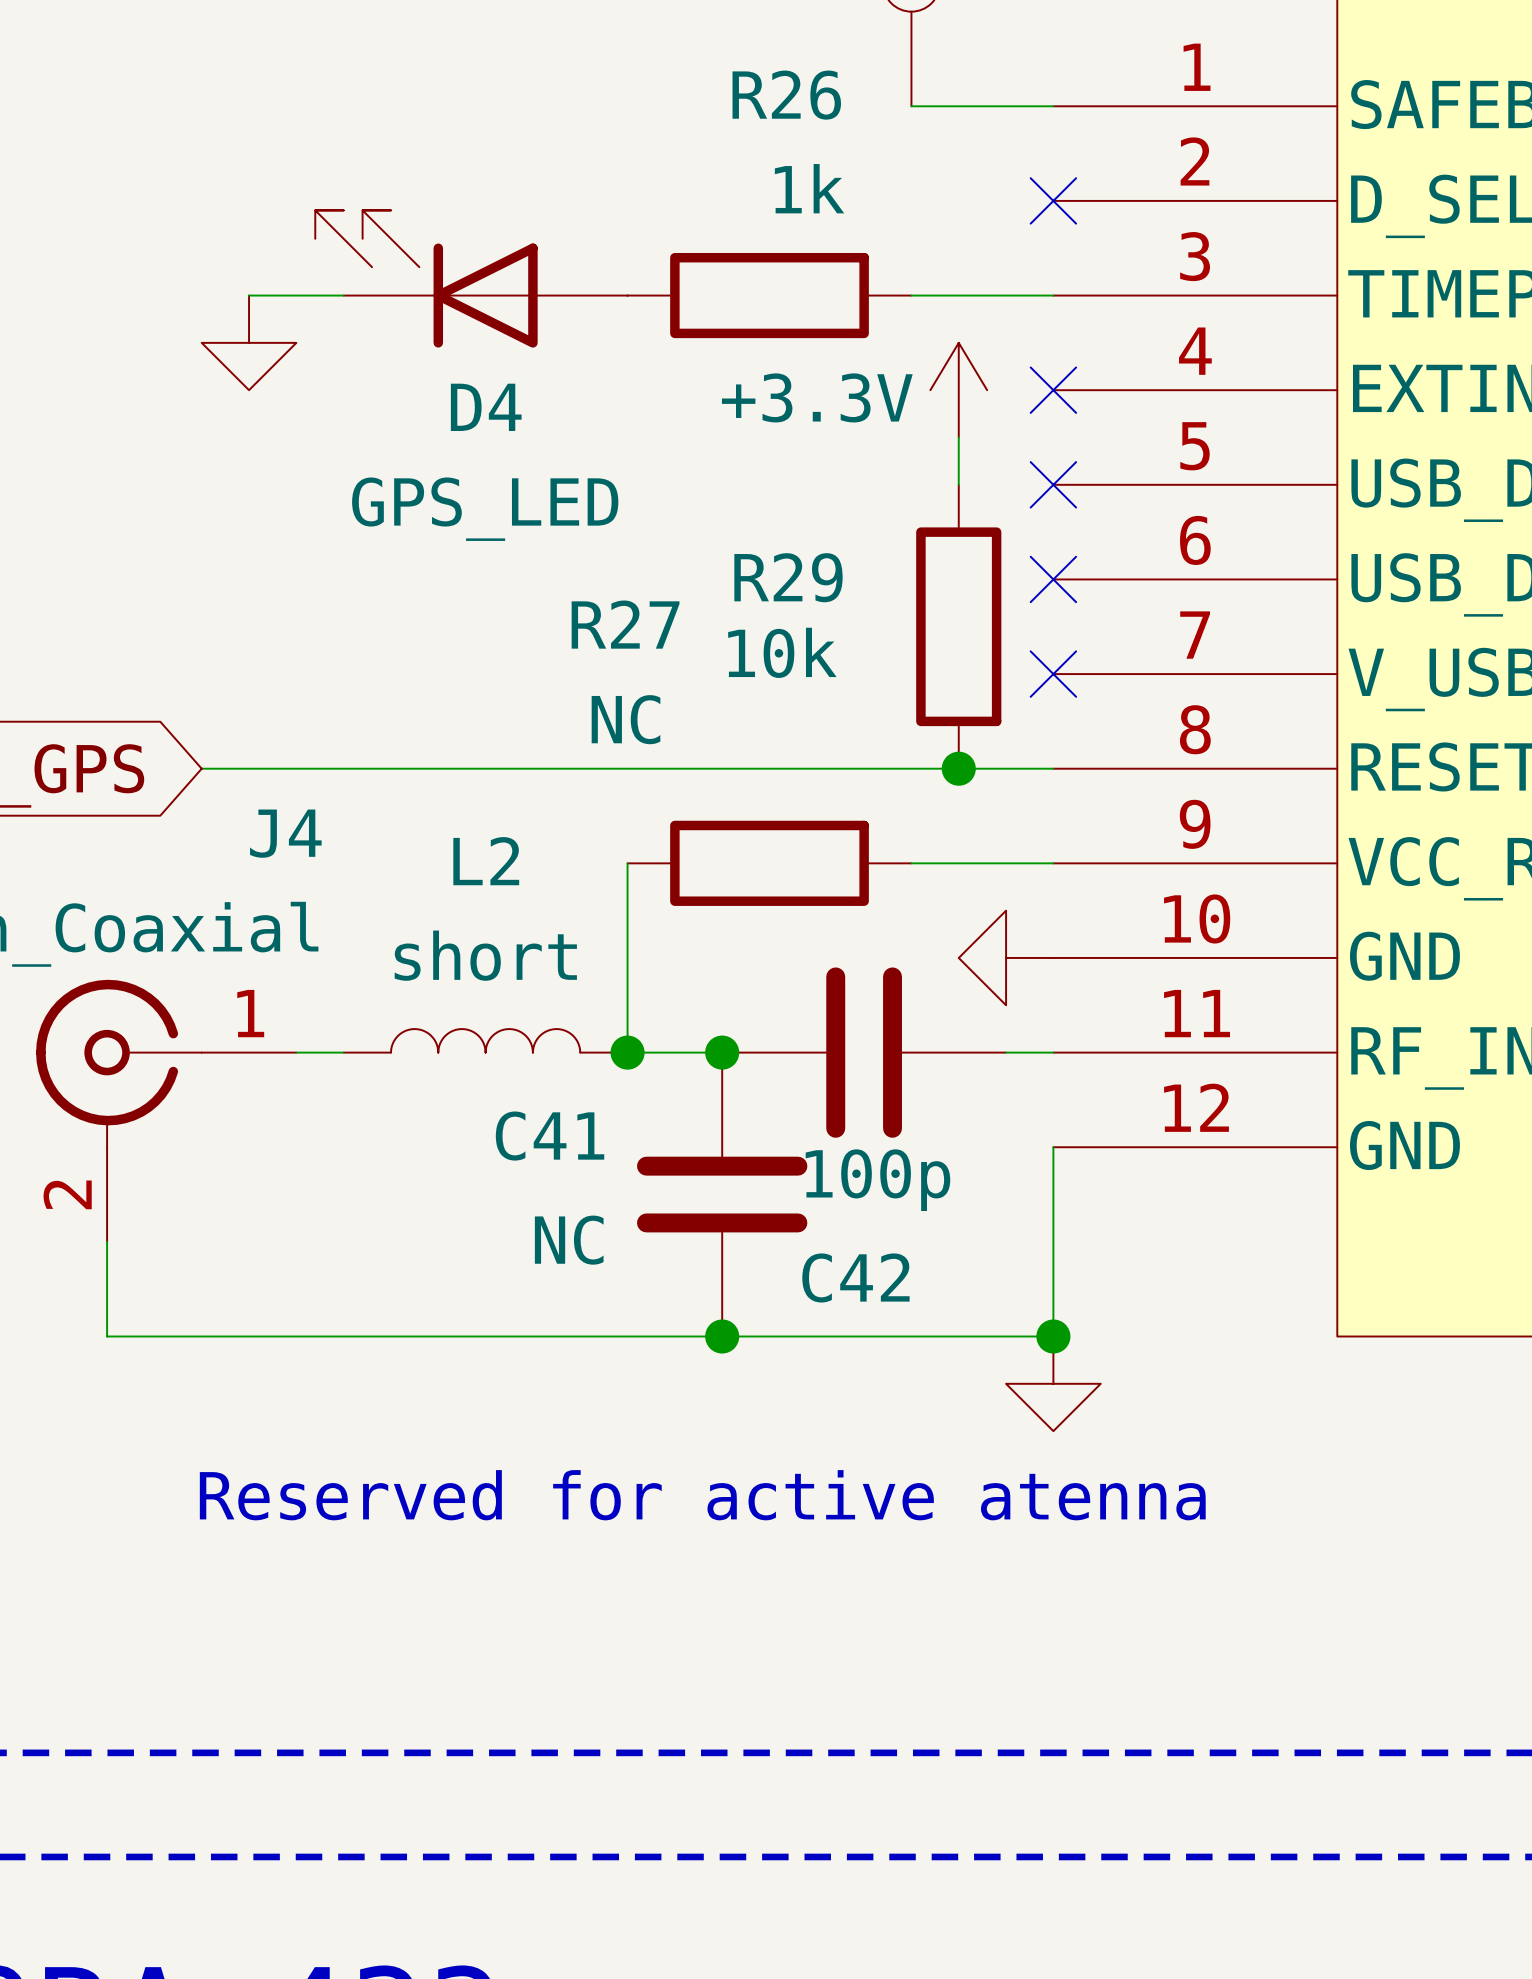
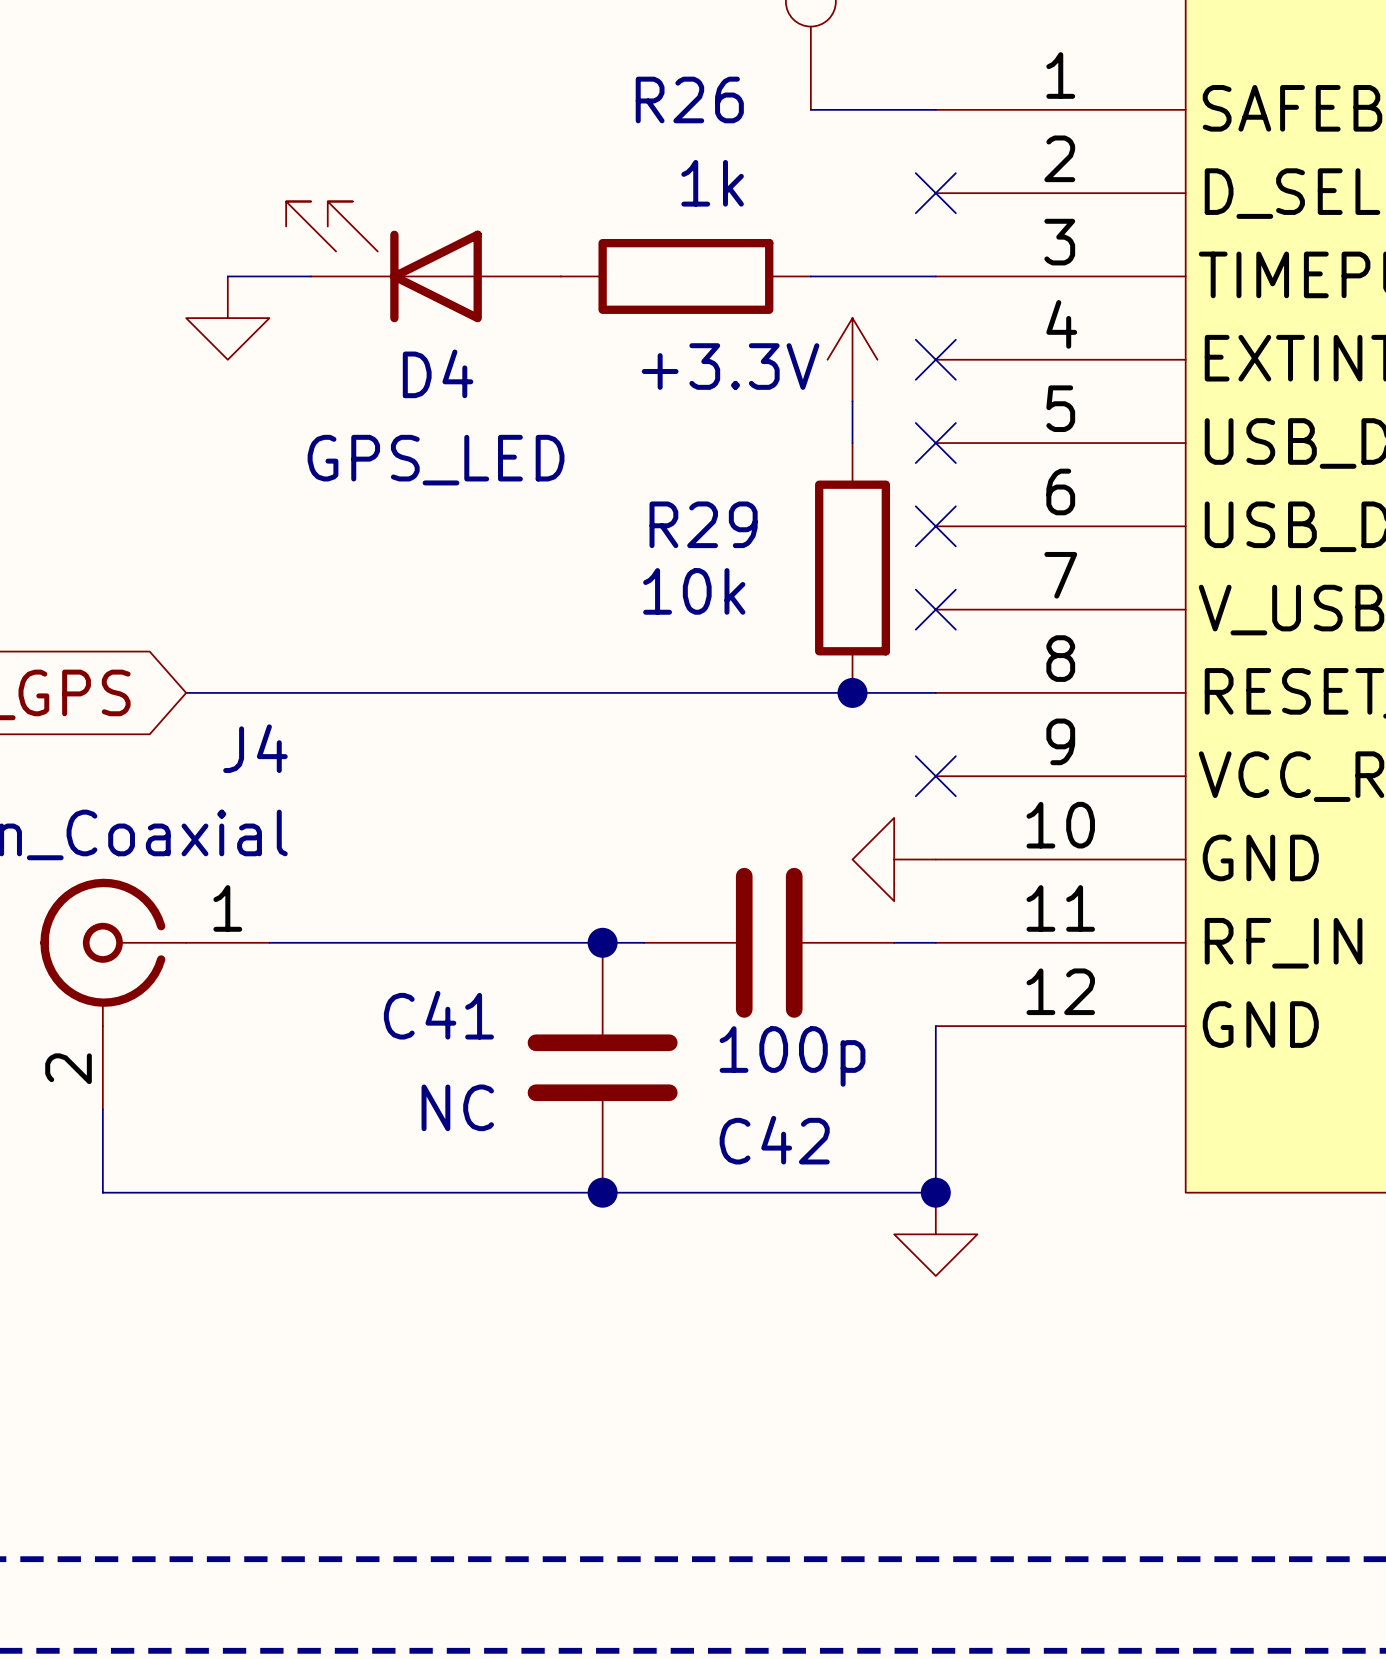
wire: (627, 863) (627, 1052) -> (311, 942) (560, 942)
R27: NC (769, 863) -> none
wire: (911, 863) (1053, 863) -> none
no-connect mark: none -> (935, 776)
L2: short (485, 1040) -> none
junction: (627, 1052) -> none
junction: none -> (602, 942)
junction: (722, 1052) -> none
C41 position: (722, 1194) -> (602, 1067)
junction position: (722, 1336) -> (602, 1192)
text: Reserved for active atenna (702, 1495) -> none

